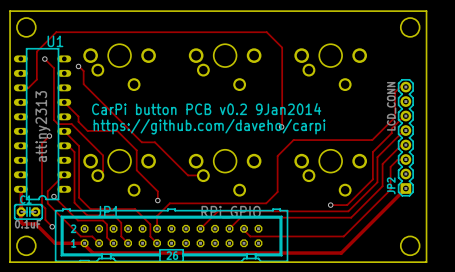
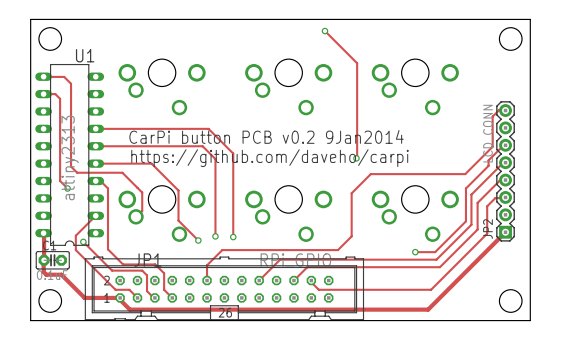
via: none -> (324, 31)
track: (266, 32) (56, 32) (36, 51) (36, 79) (28, 88) (20, 87) -> (338, 44) (324, 31)
track: (44, 59) (53, 68) (53, 120) (57, 124) (71, 124) (86, 138) -> (43, 76) (64, 76) (71, 83) (71, 166) (77, 172) (122, 172)
via: (44, 59) -> none
via: (78, 66) -> none
track: (79, 66) (83, 71) (83, 84) (141, 142) (154, 142) (188, 175) (203, 175) -> none
track: none -> (43, 94) (55, 94) (60, 98) (60, 180) (67, 188)
track: (64, 102) (78, 116) (78, 121) (87, 130) (117, 130) (136, 150) (136, 170) (157, 191) (157, 200) -> (95, 128) (208, 128) (233, 153) (233, 237)
track: none -> (95, 146) (202, 146) (215, 159) (215, 236)
track: (64, 131) (79, 146) (79, 197) (90, 209) (134, 209) (150, 224) (150, 236) (157, 243) -> (95, 163) (151, 163) (178, 190) (178, 220) (198, 240)
track: (49, 136) (41, 143) (41, 205) (45, 208) (45, 219) (52, 226) -> none
via position: (49, 136) -> (67, 188)
via: none -> (215, 236)
via: none -> (233, 237)
via: none -> (198, 240)
via: (157, 200) -> none
via: (52, 226) -> none

